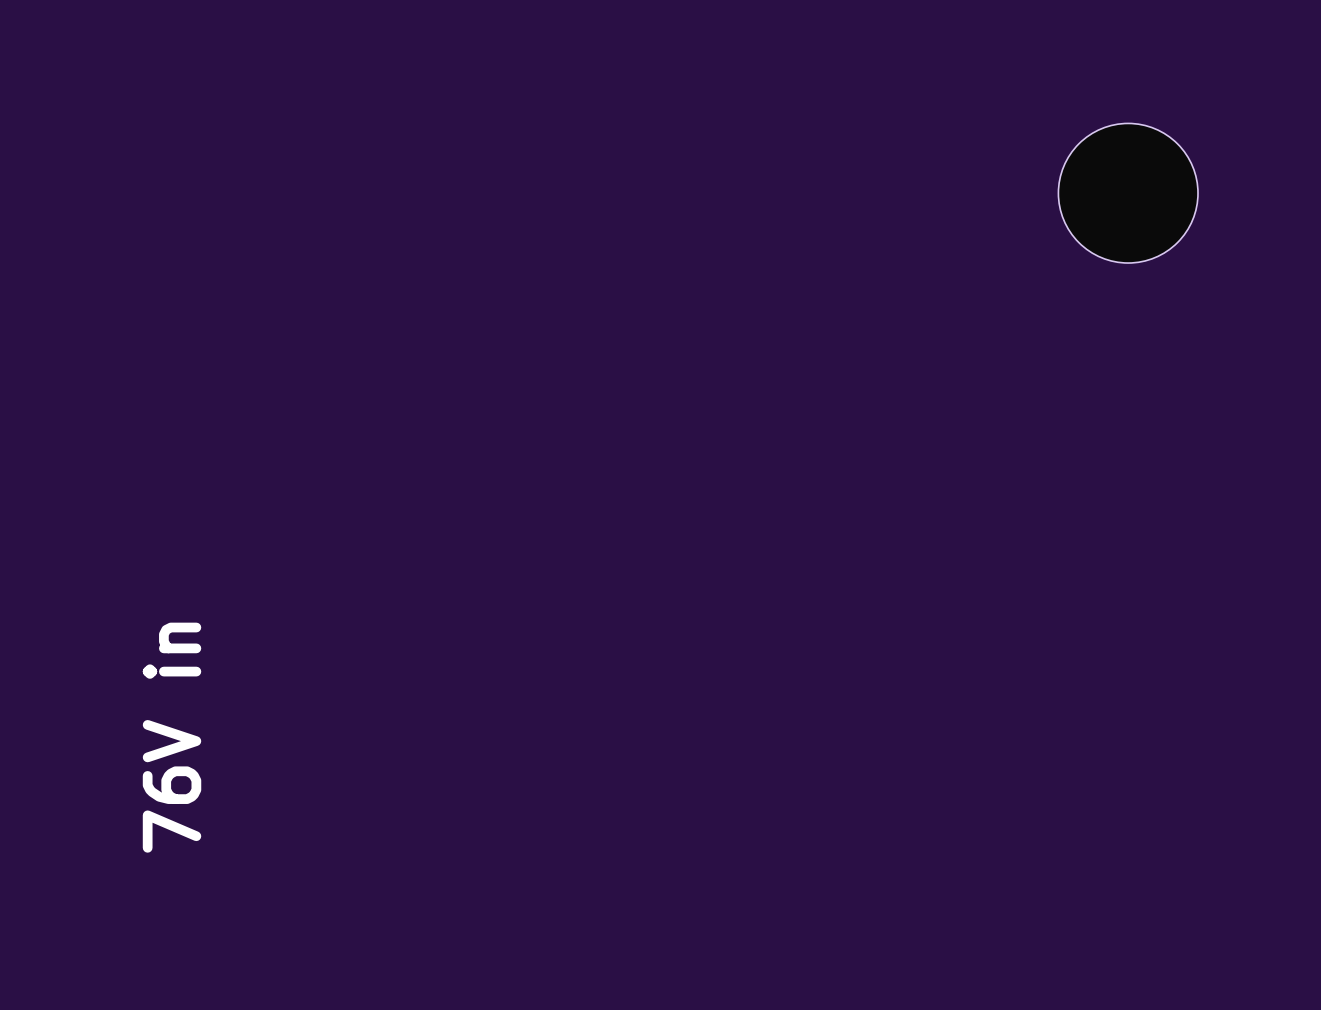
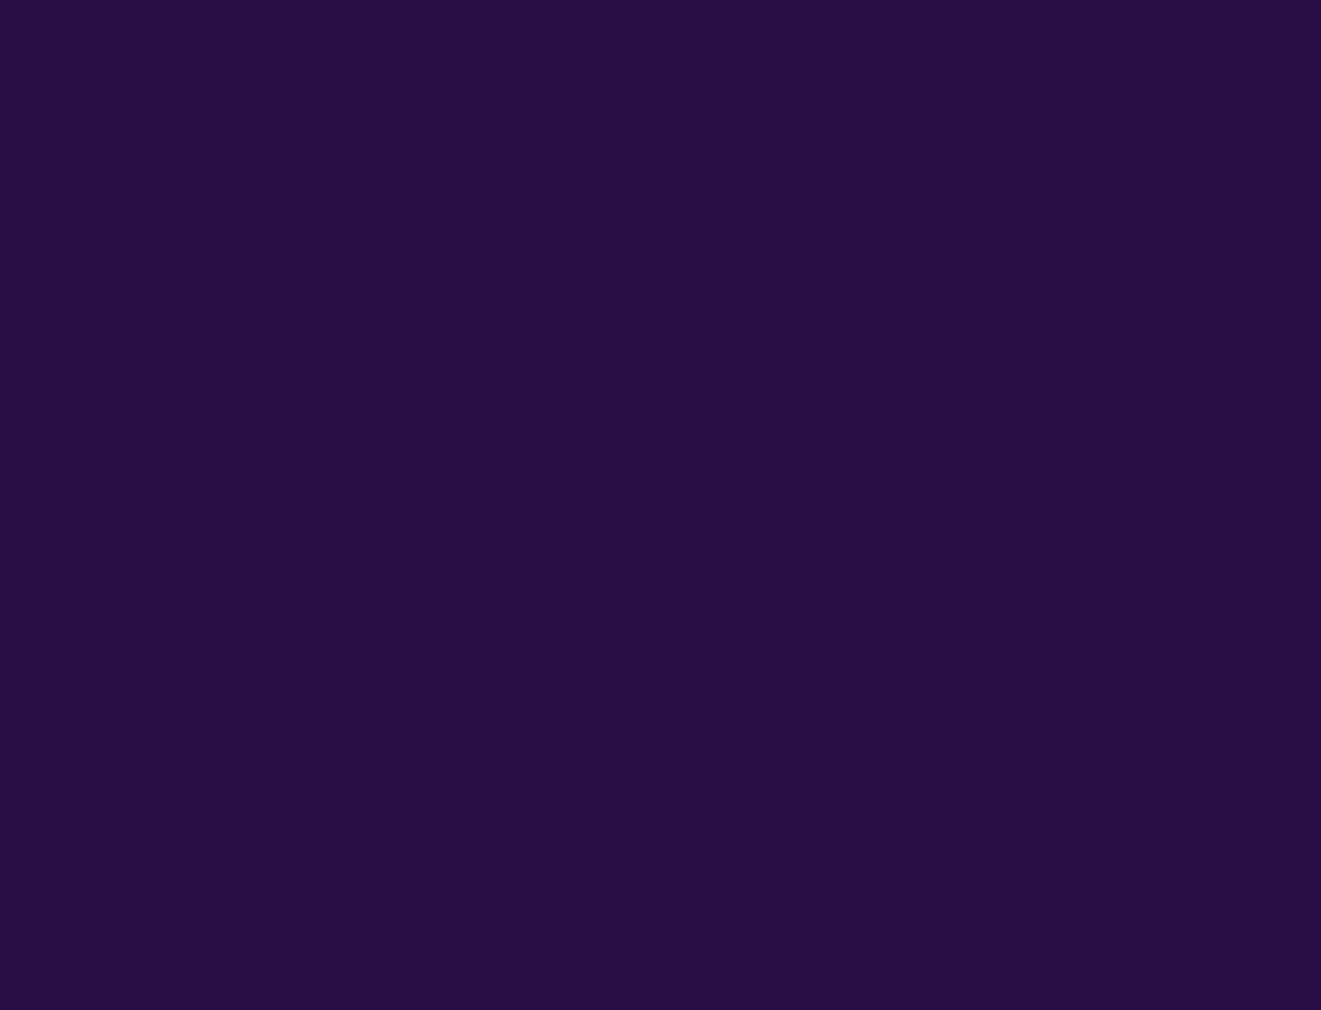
part: (1128, 193) -> none
text: 76V in (172, 737) -> none

